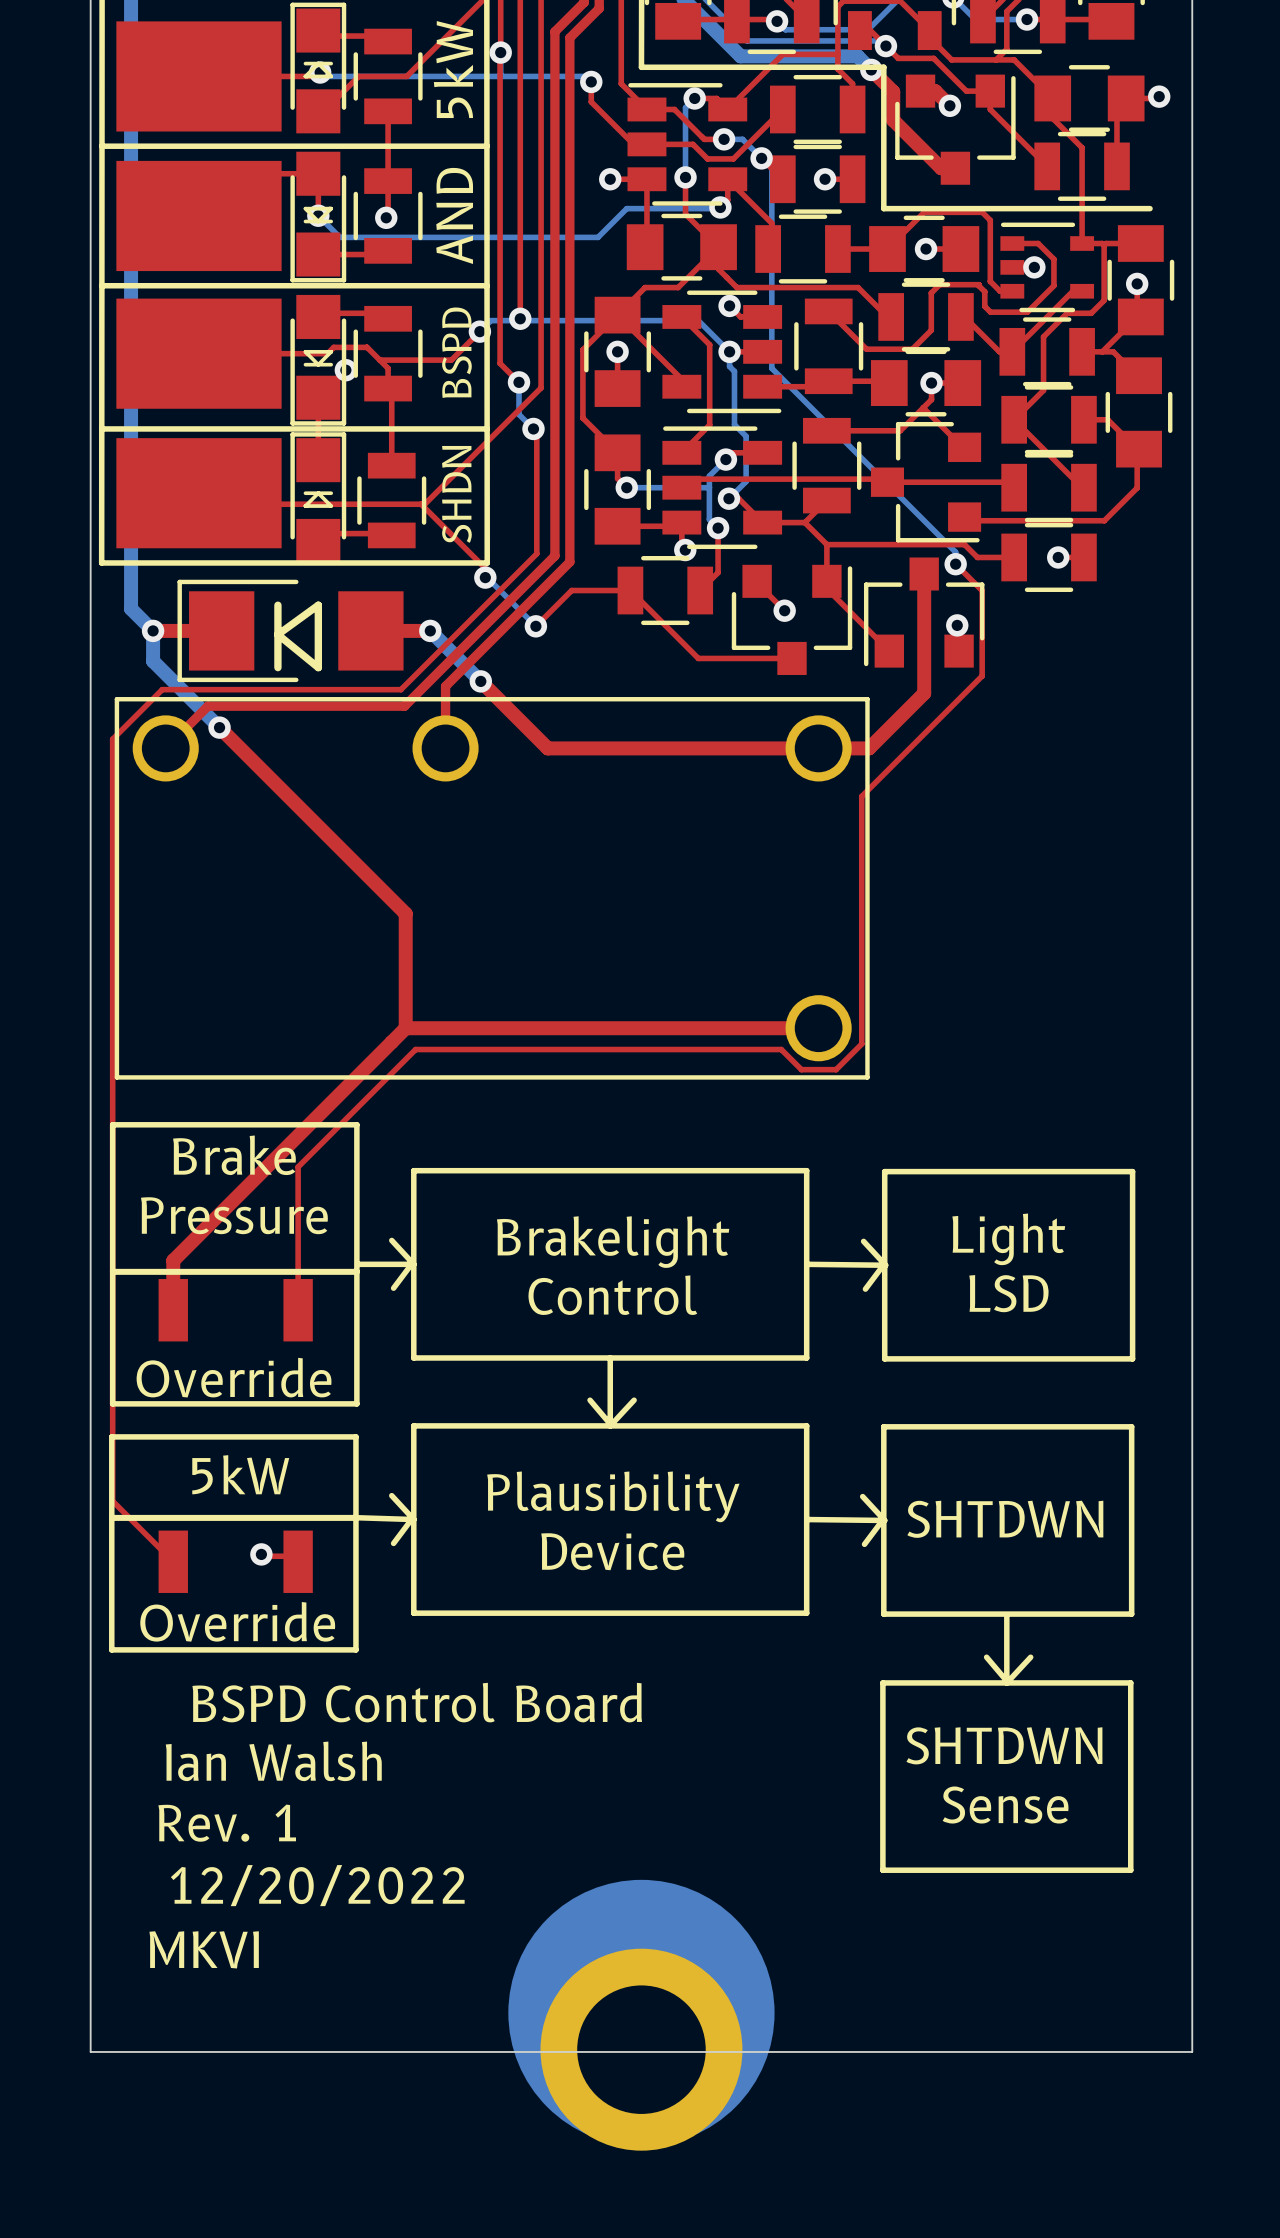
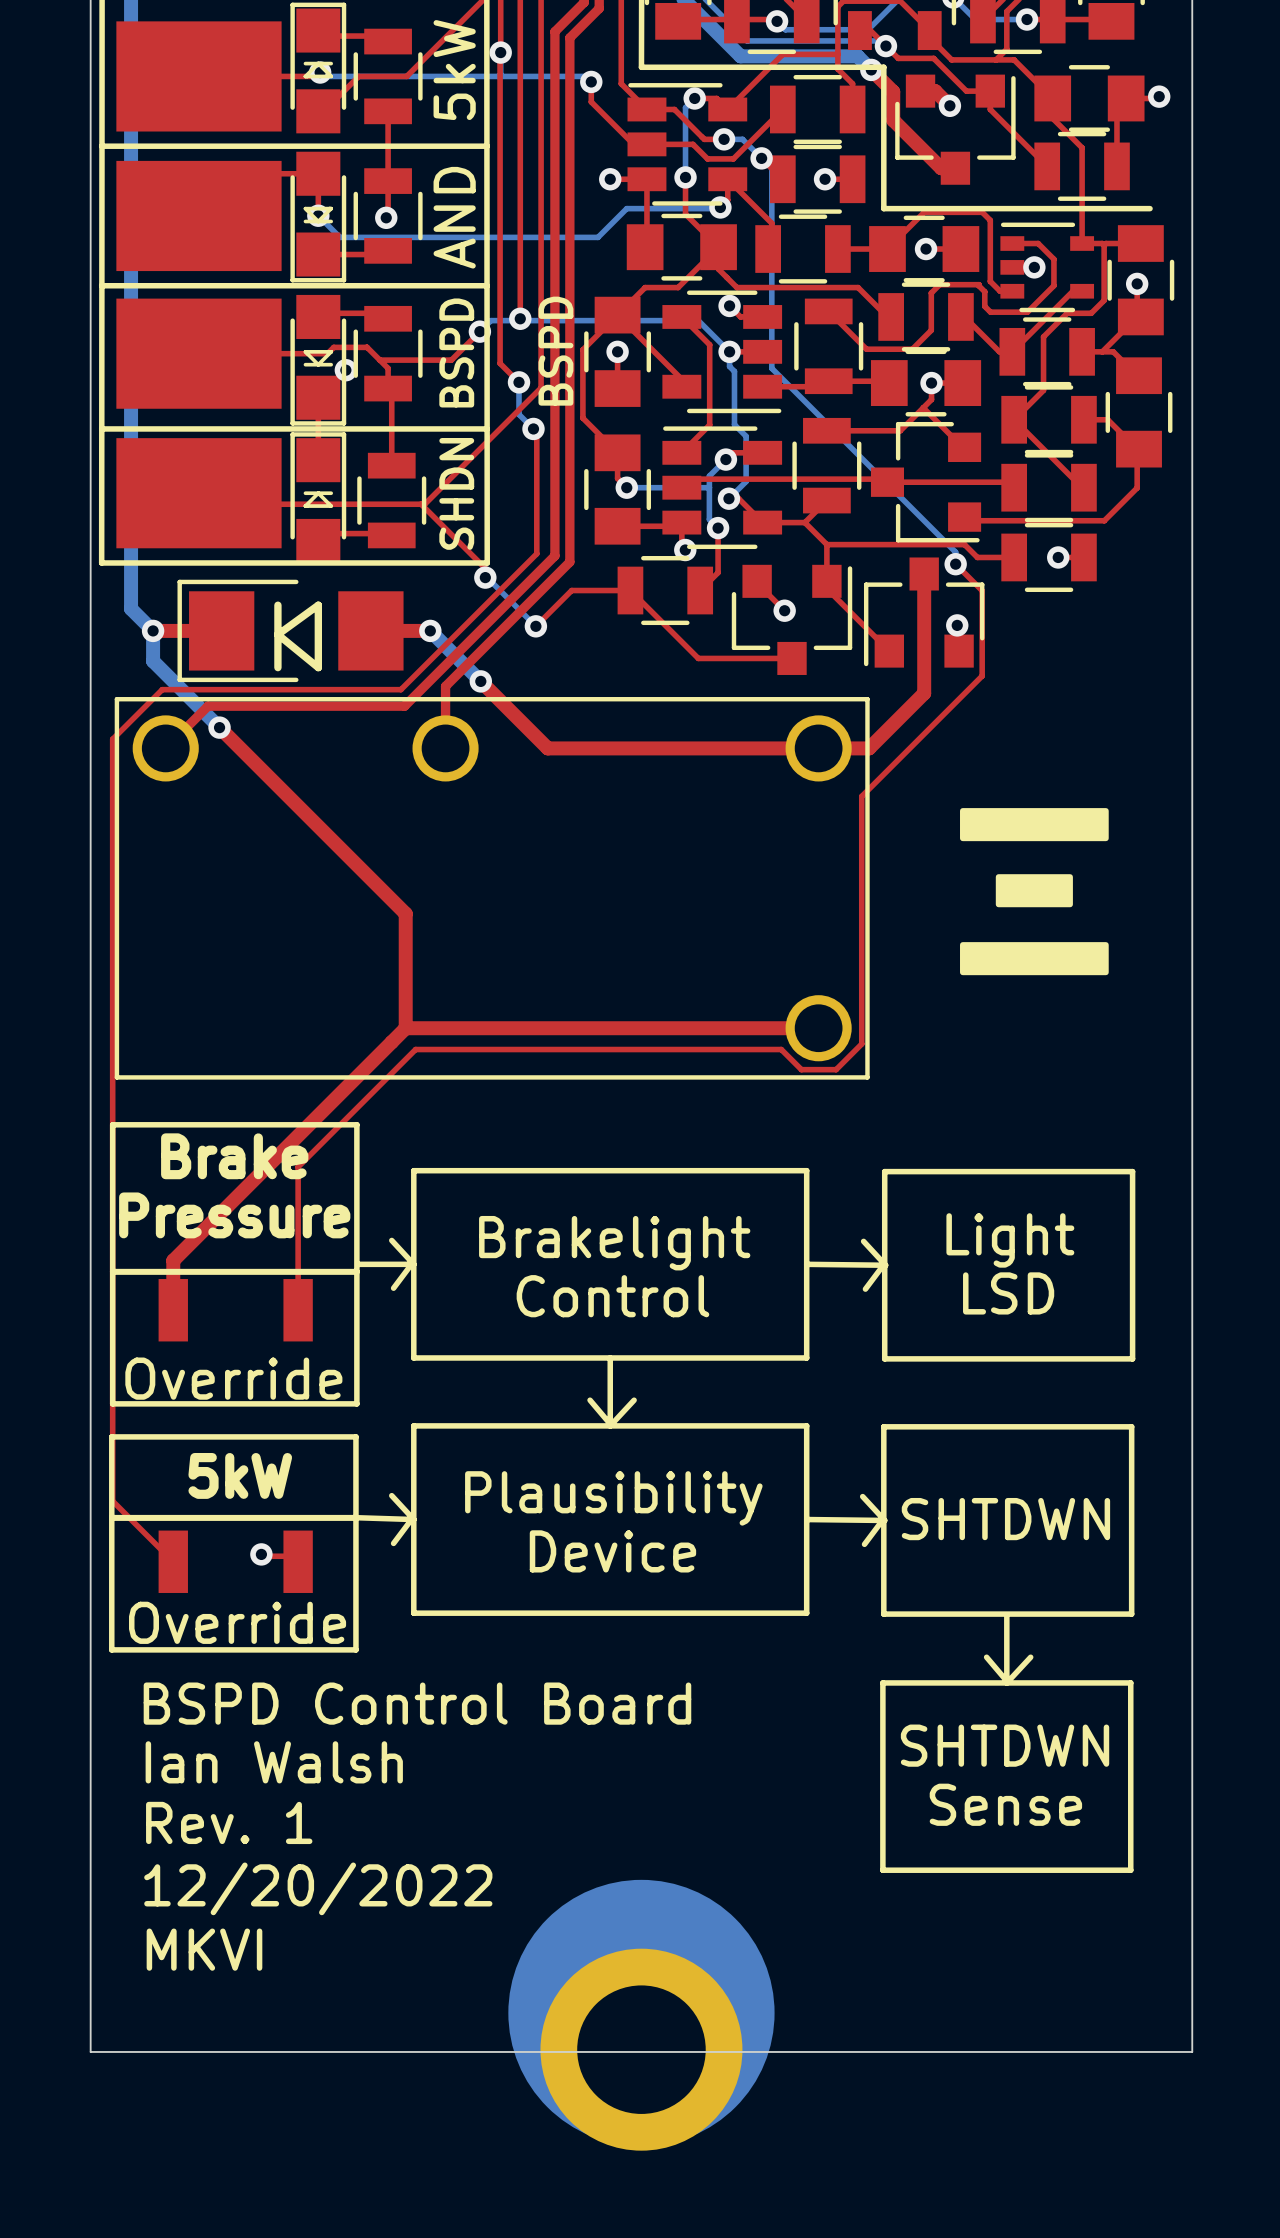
text: none -> BSPD (555, 351)
drawing: none -> [960, 808, 1109, 976]

